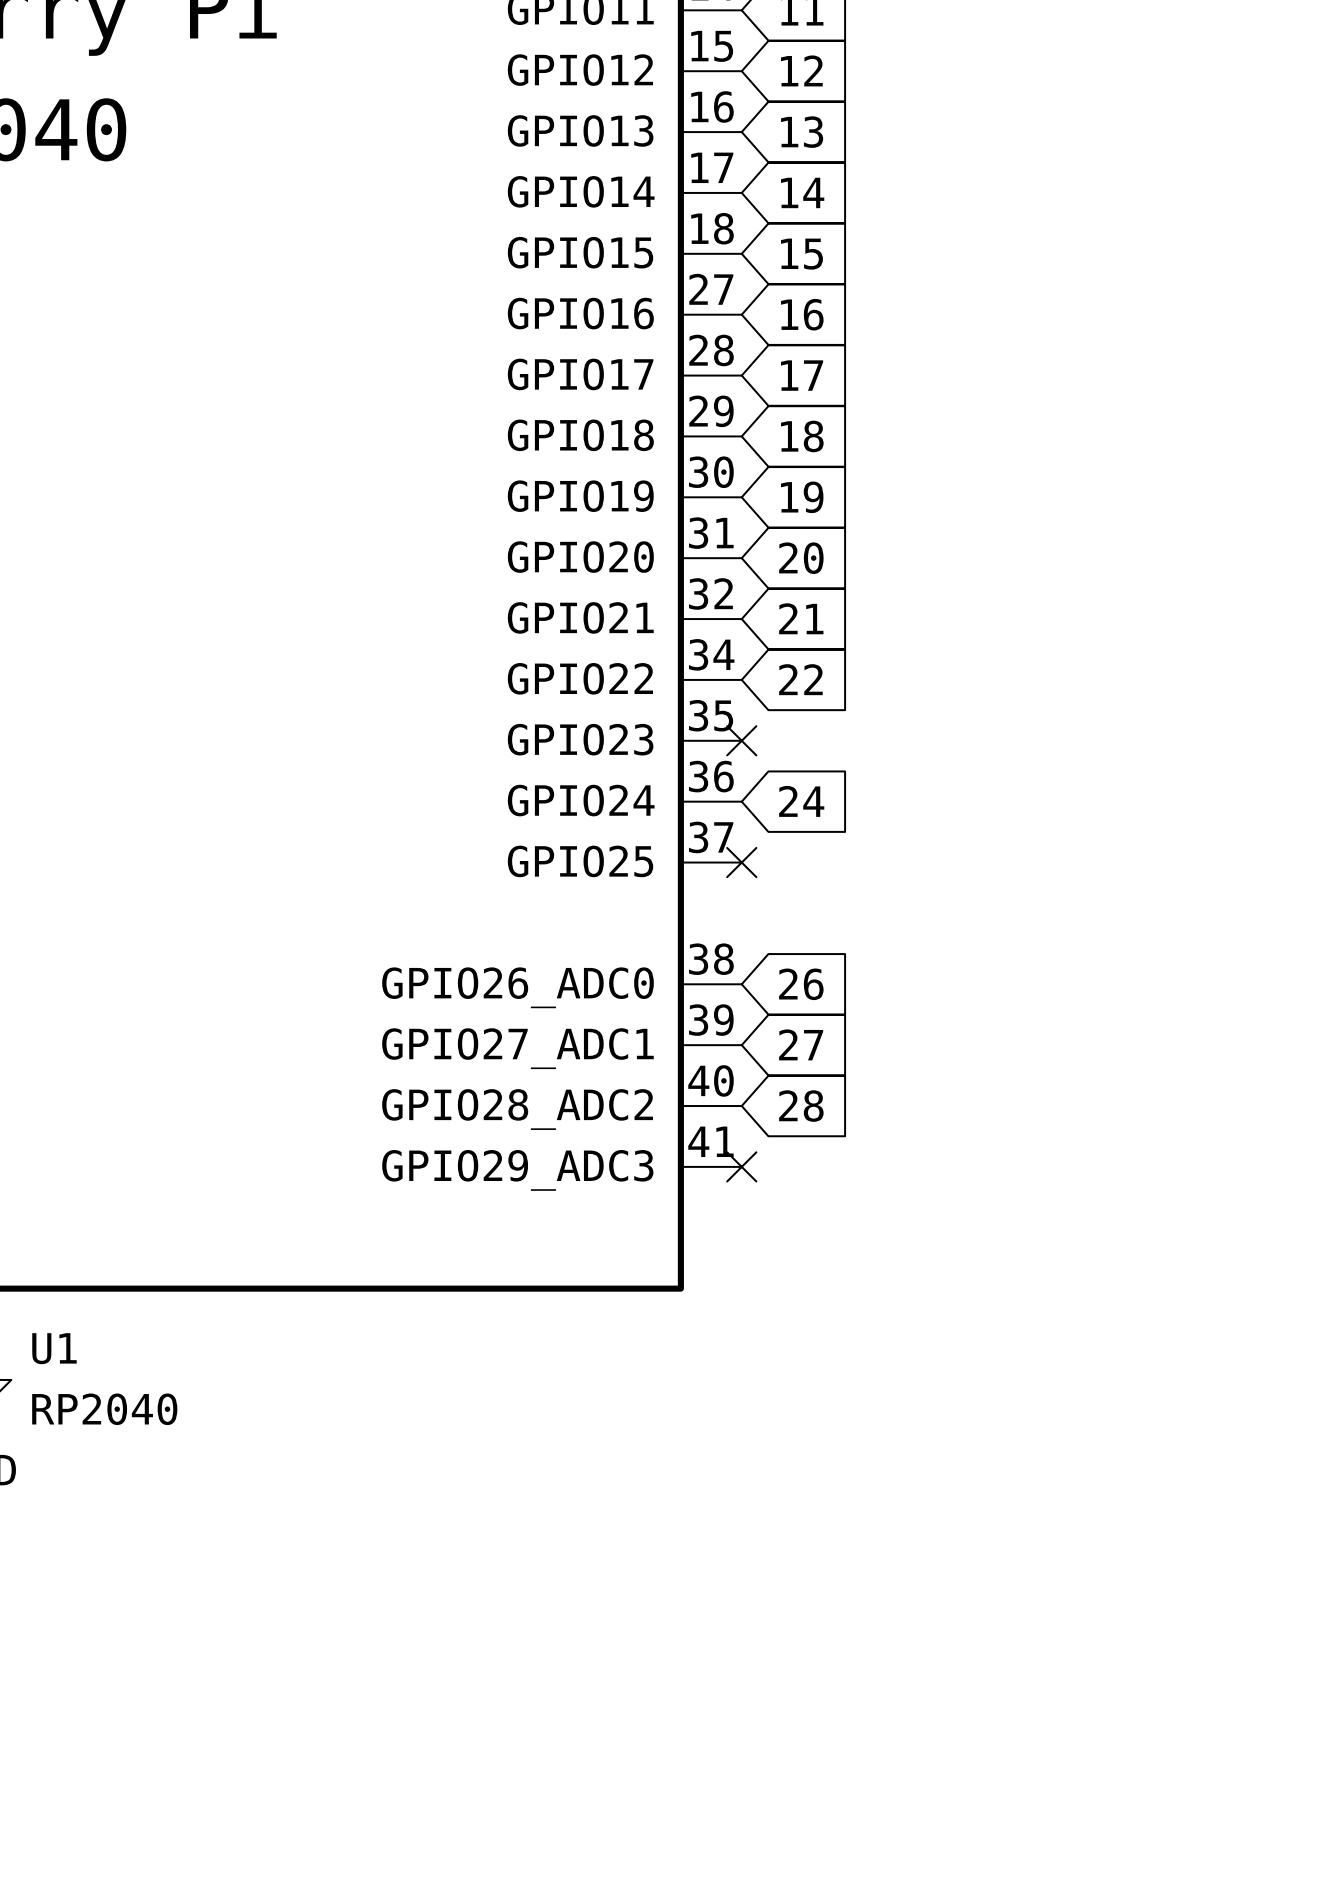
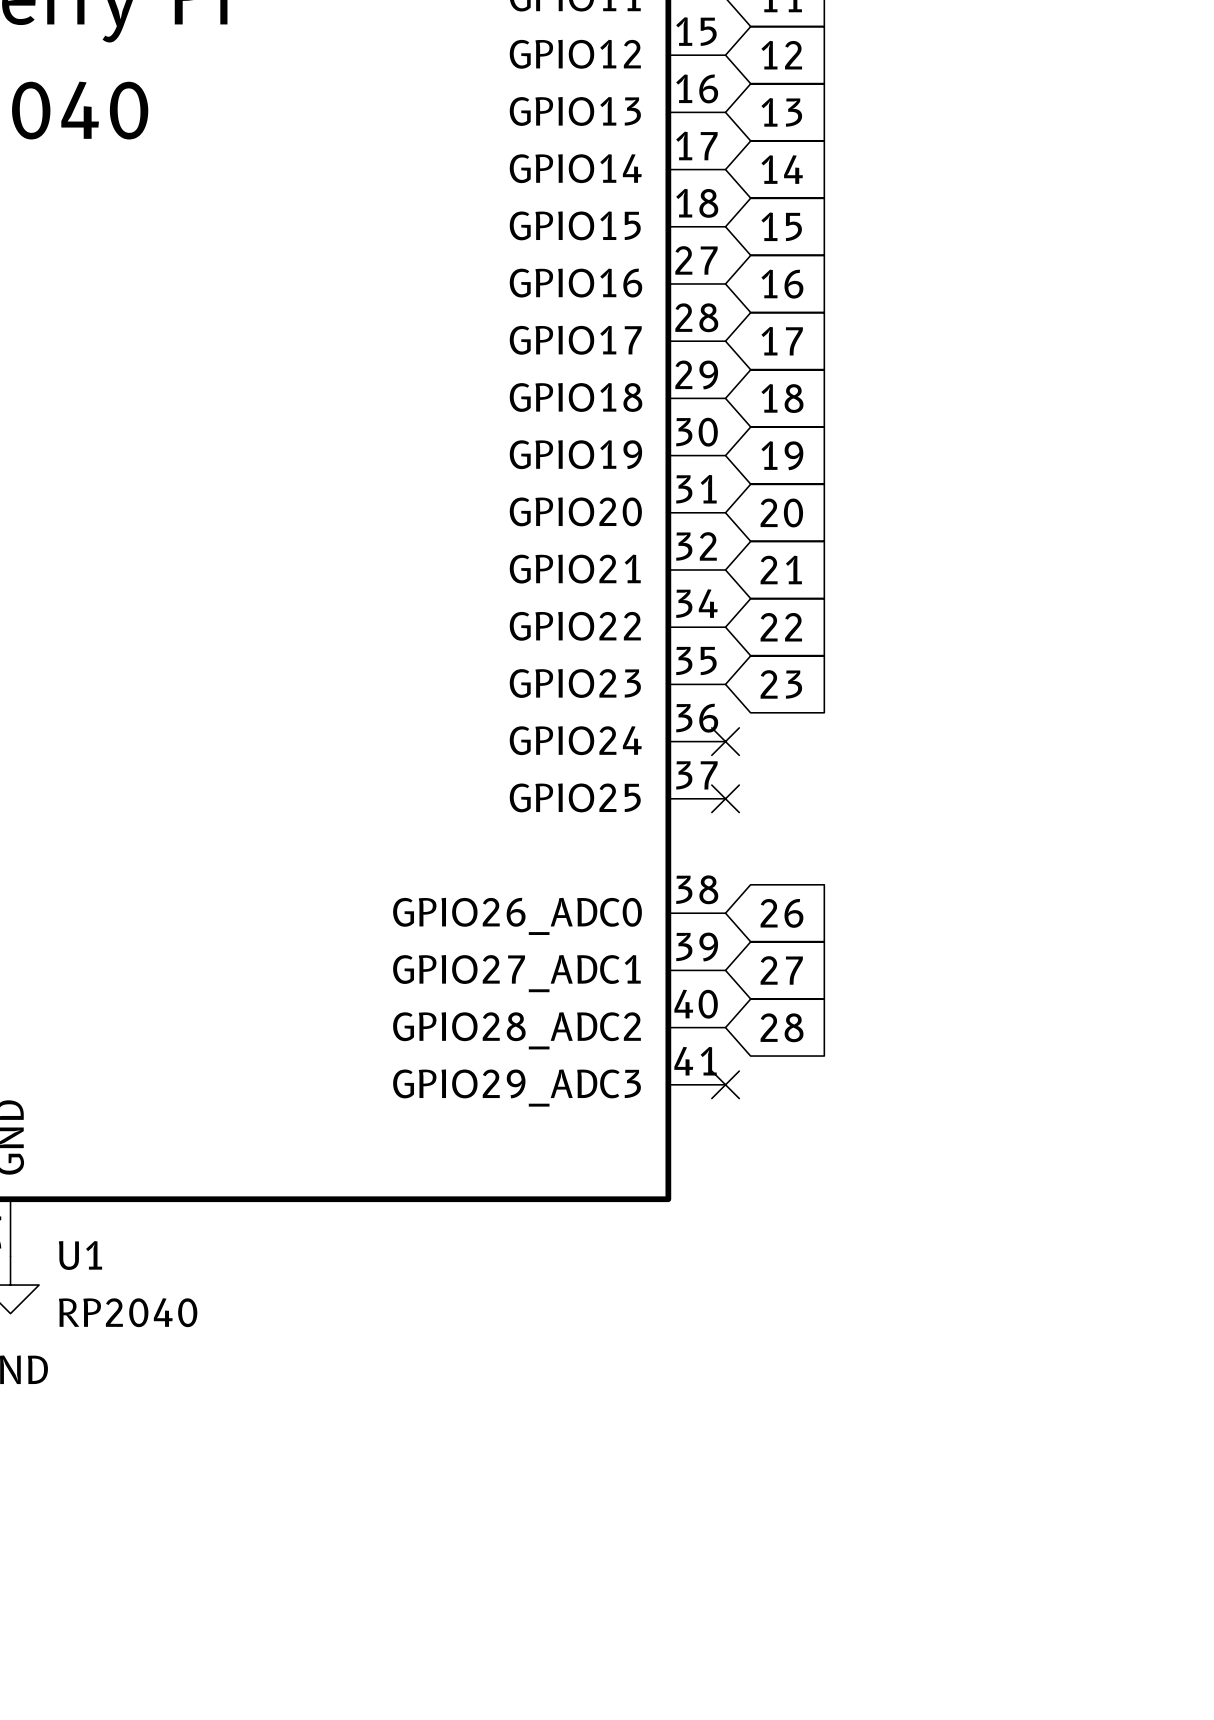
no-connect mark position: (741, 740) -> (725, 741)
global label: none -> 23 (781, 684)
global label: 24 (801, 801) -> none

